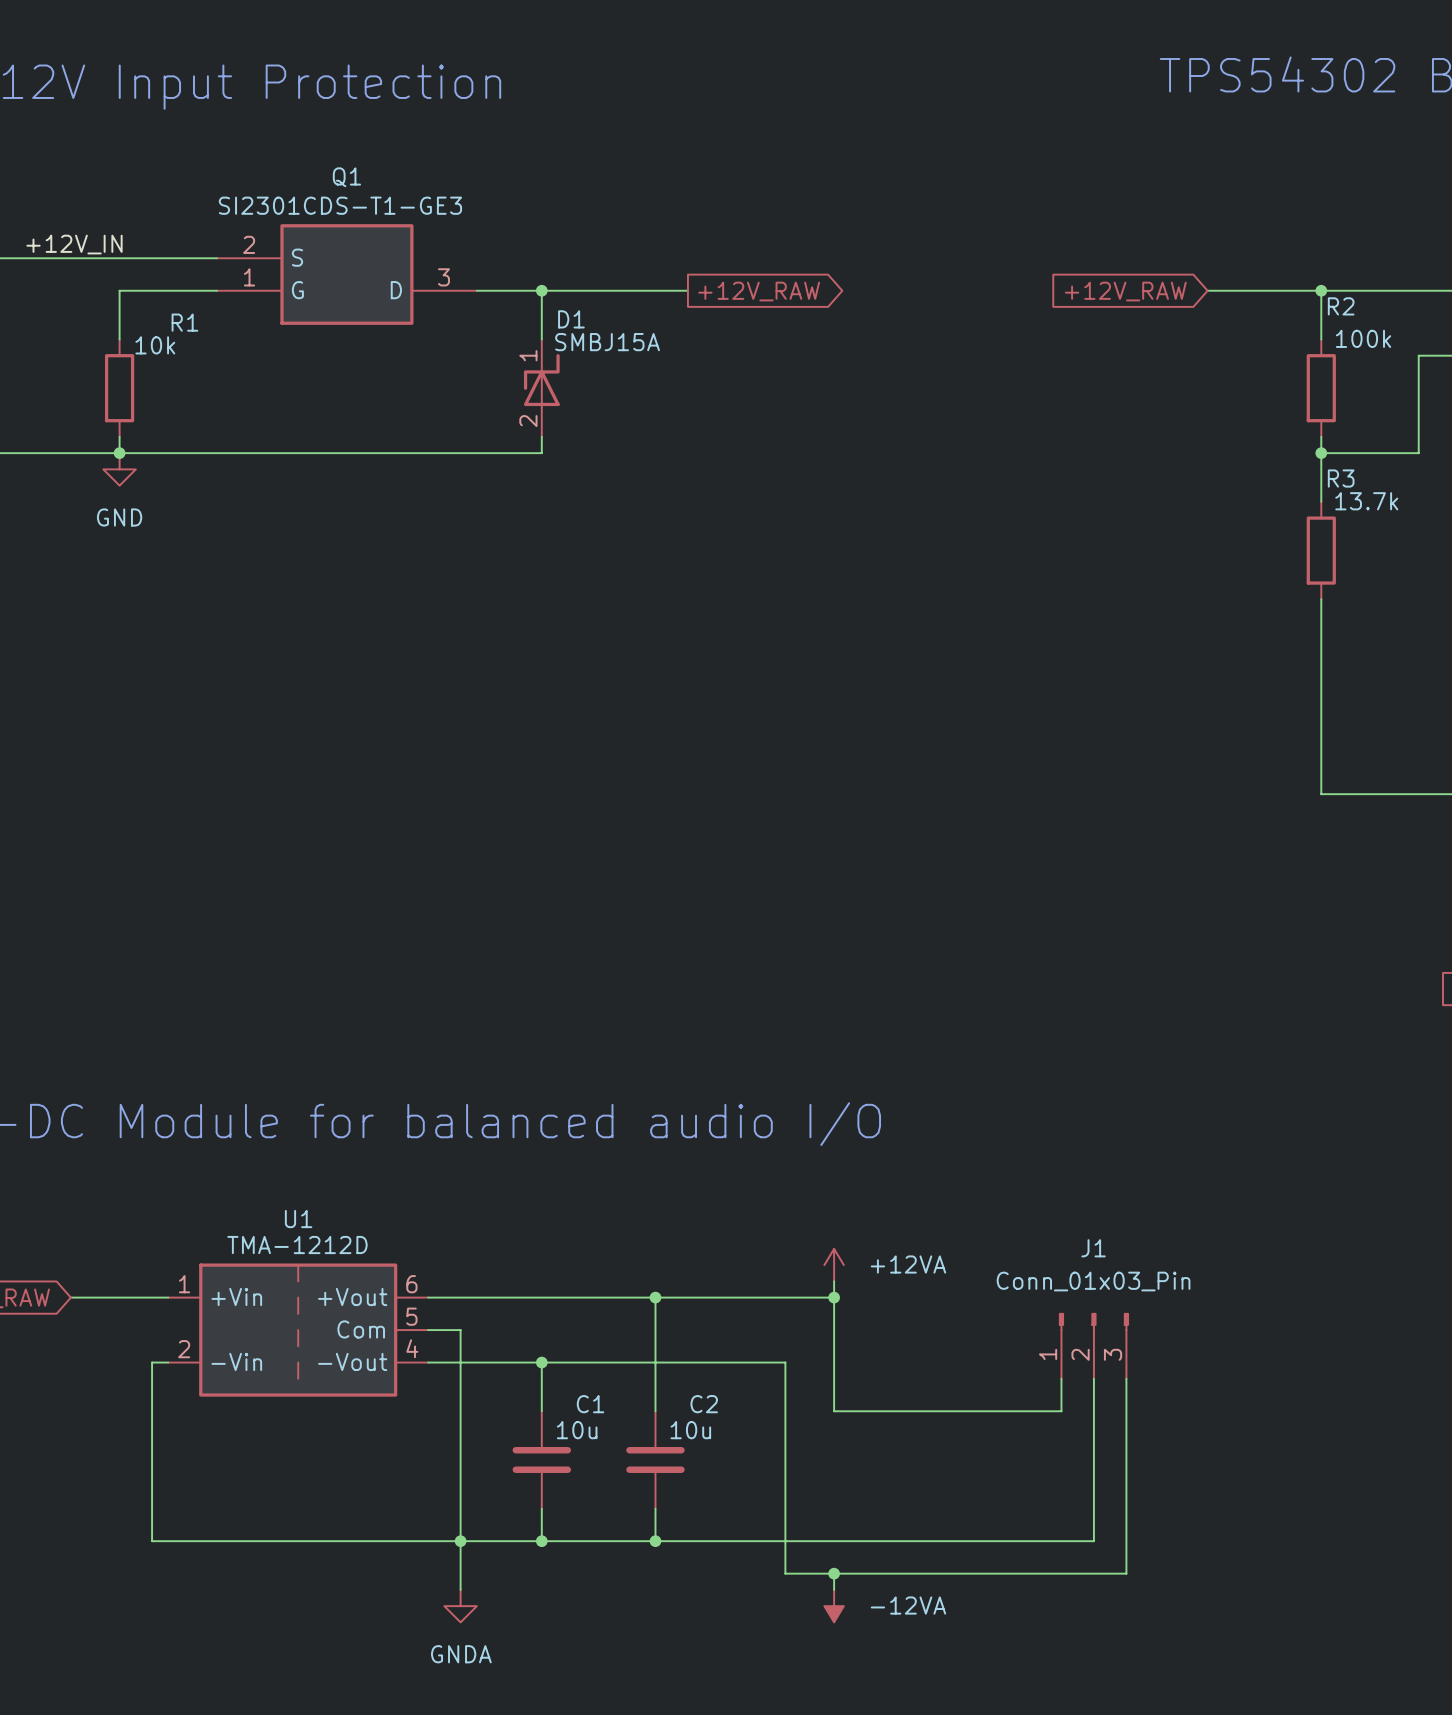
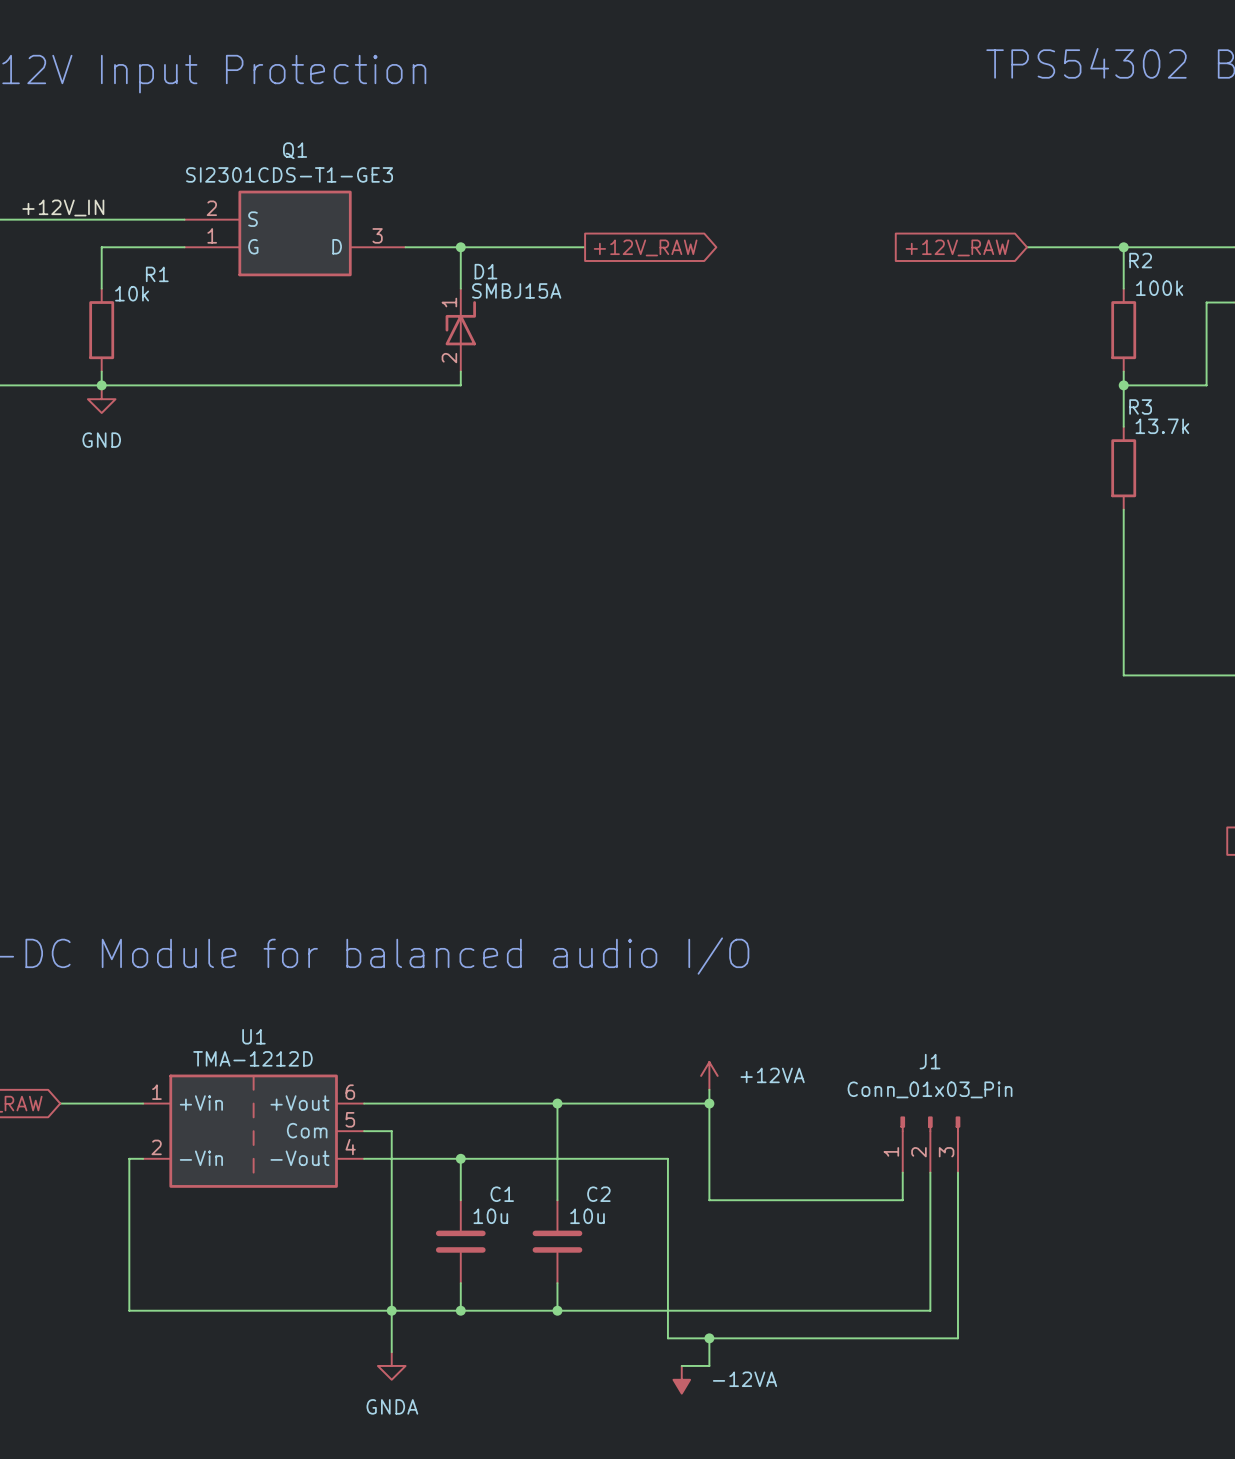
wire: none -> (709, 1352) (709, 1365) (681, 1365)
power symbol position: -12VA (834, 1606) -> -12VA (681, 1379)

